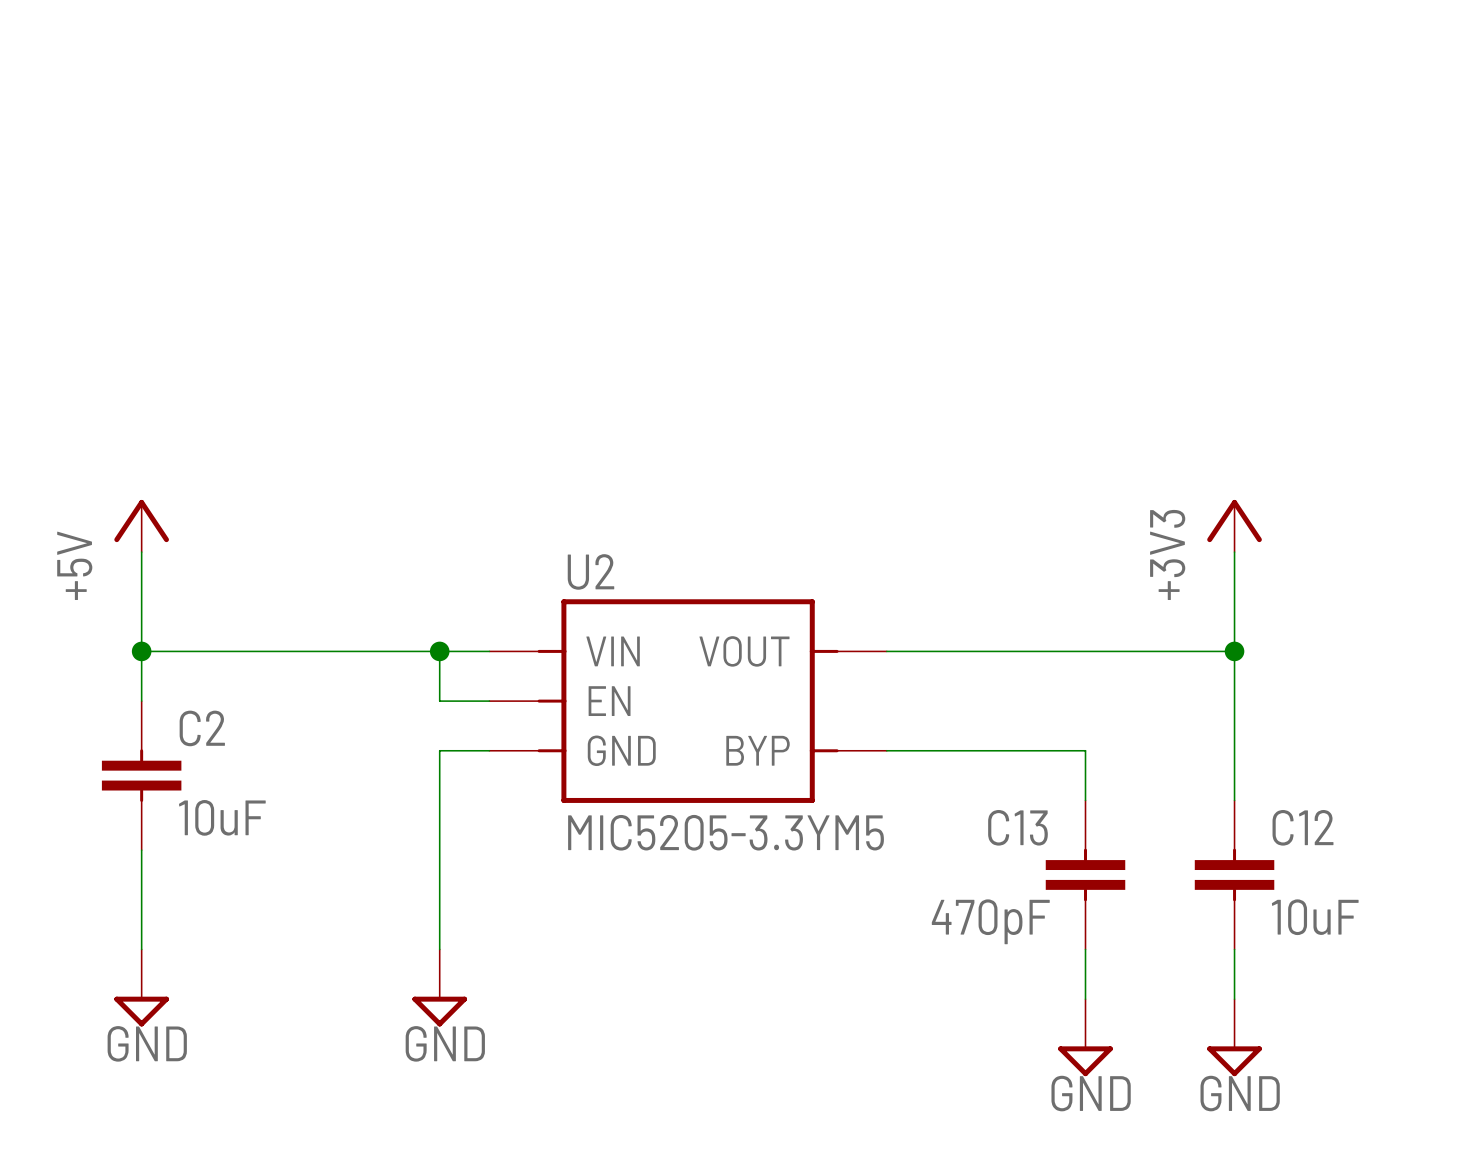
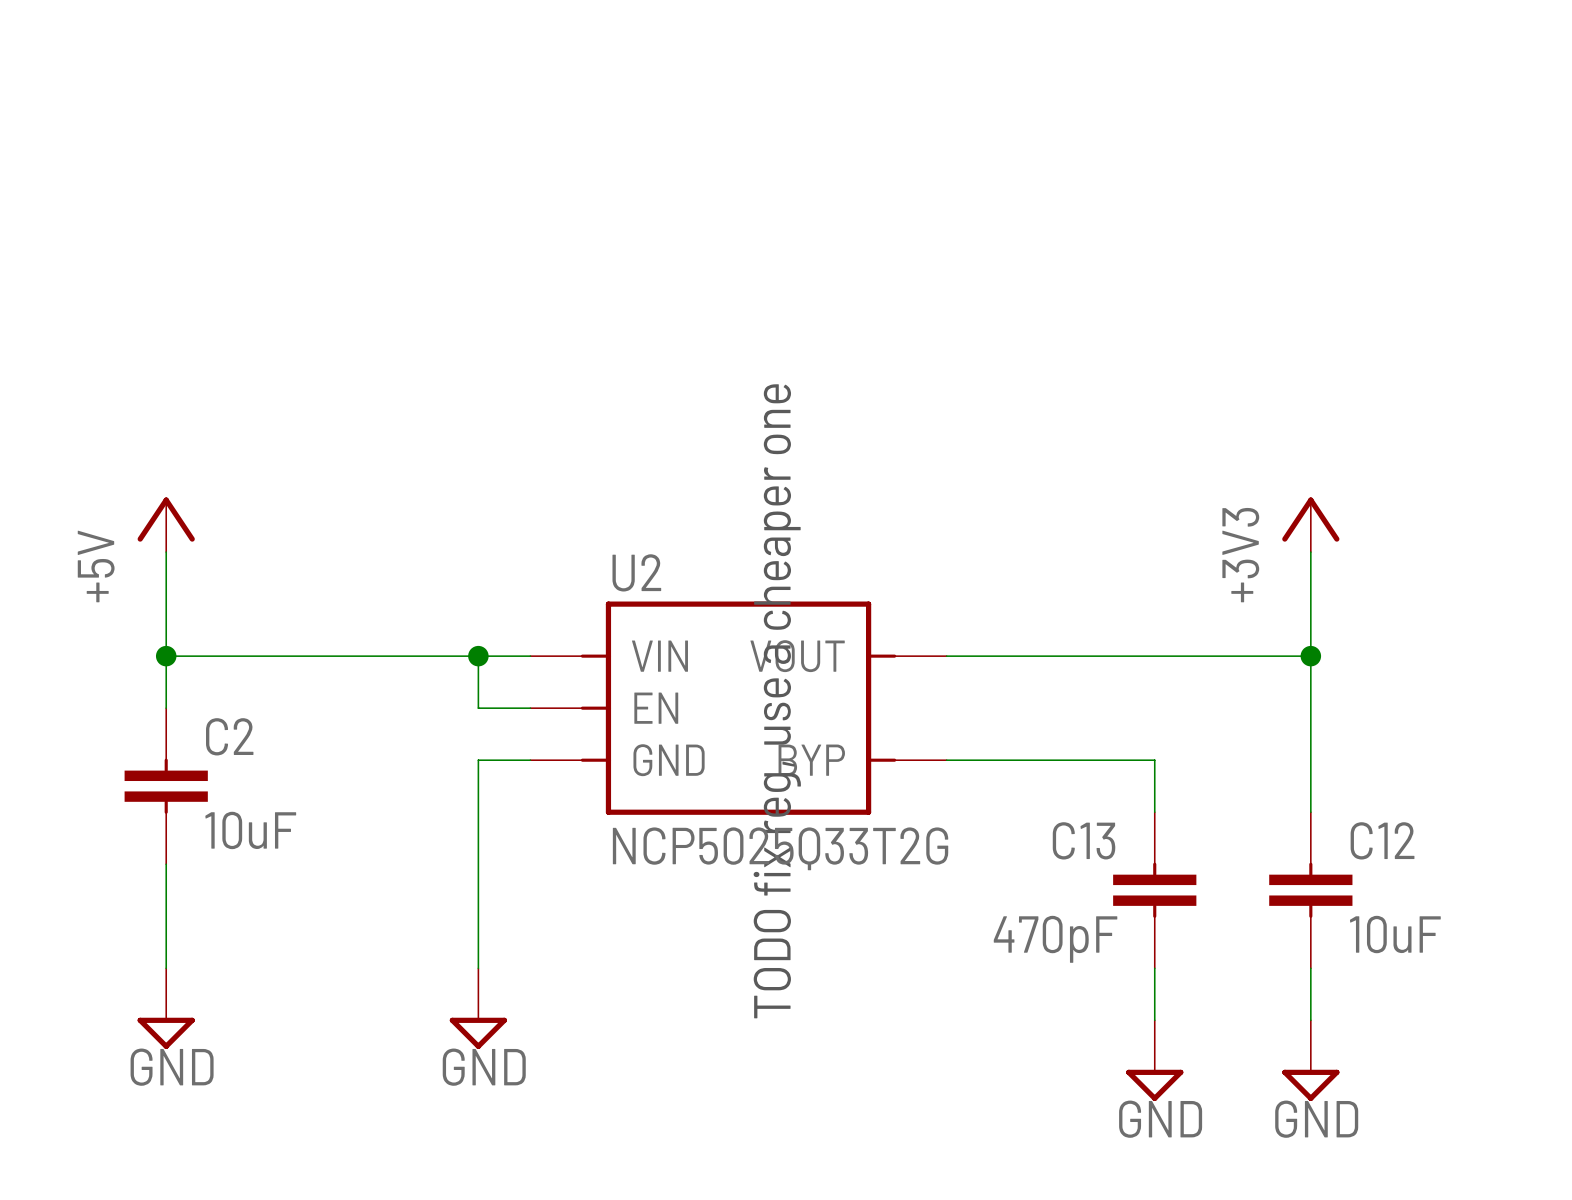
text: none -> TODO fix reg, use a cheaper one (777, 701)
U2 value: MIC5205-3.3YM5 (726, 832) -> NCP5025Q33T2G (780, 848)

